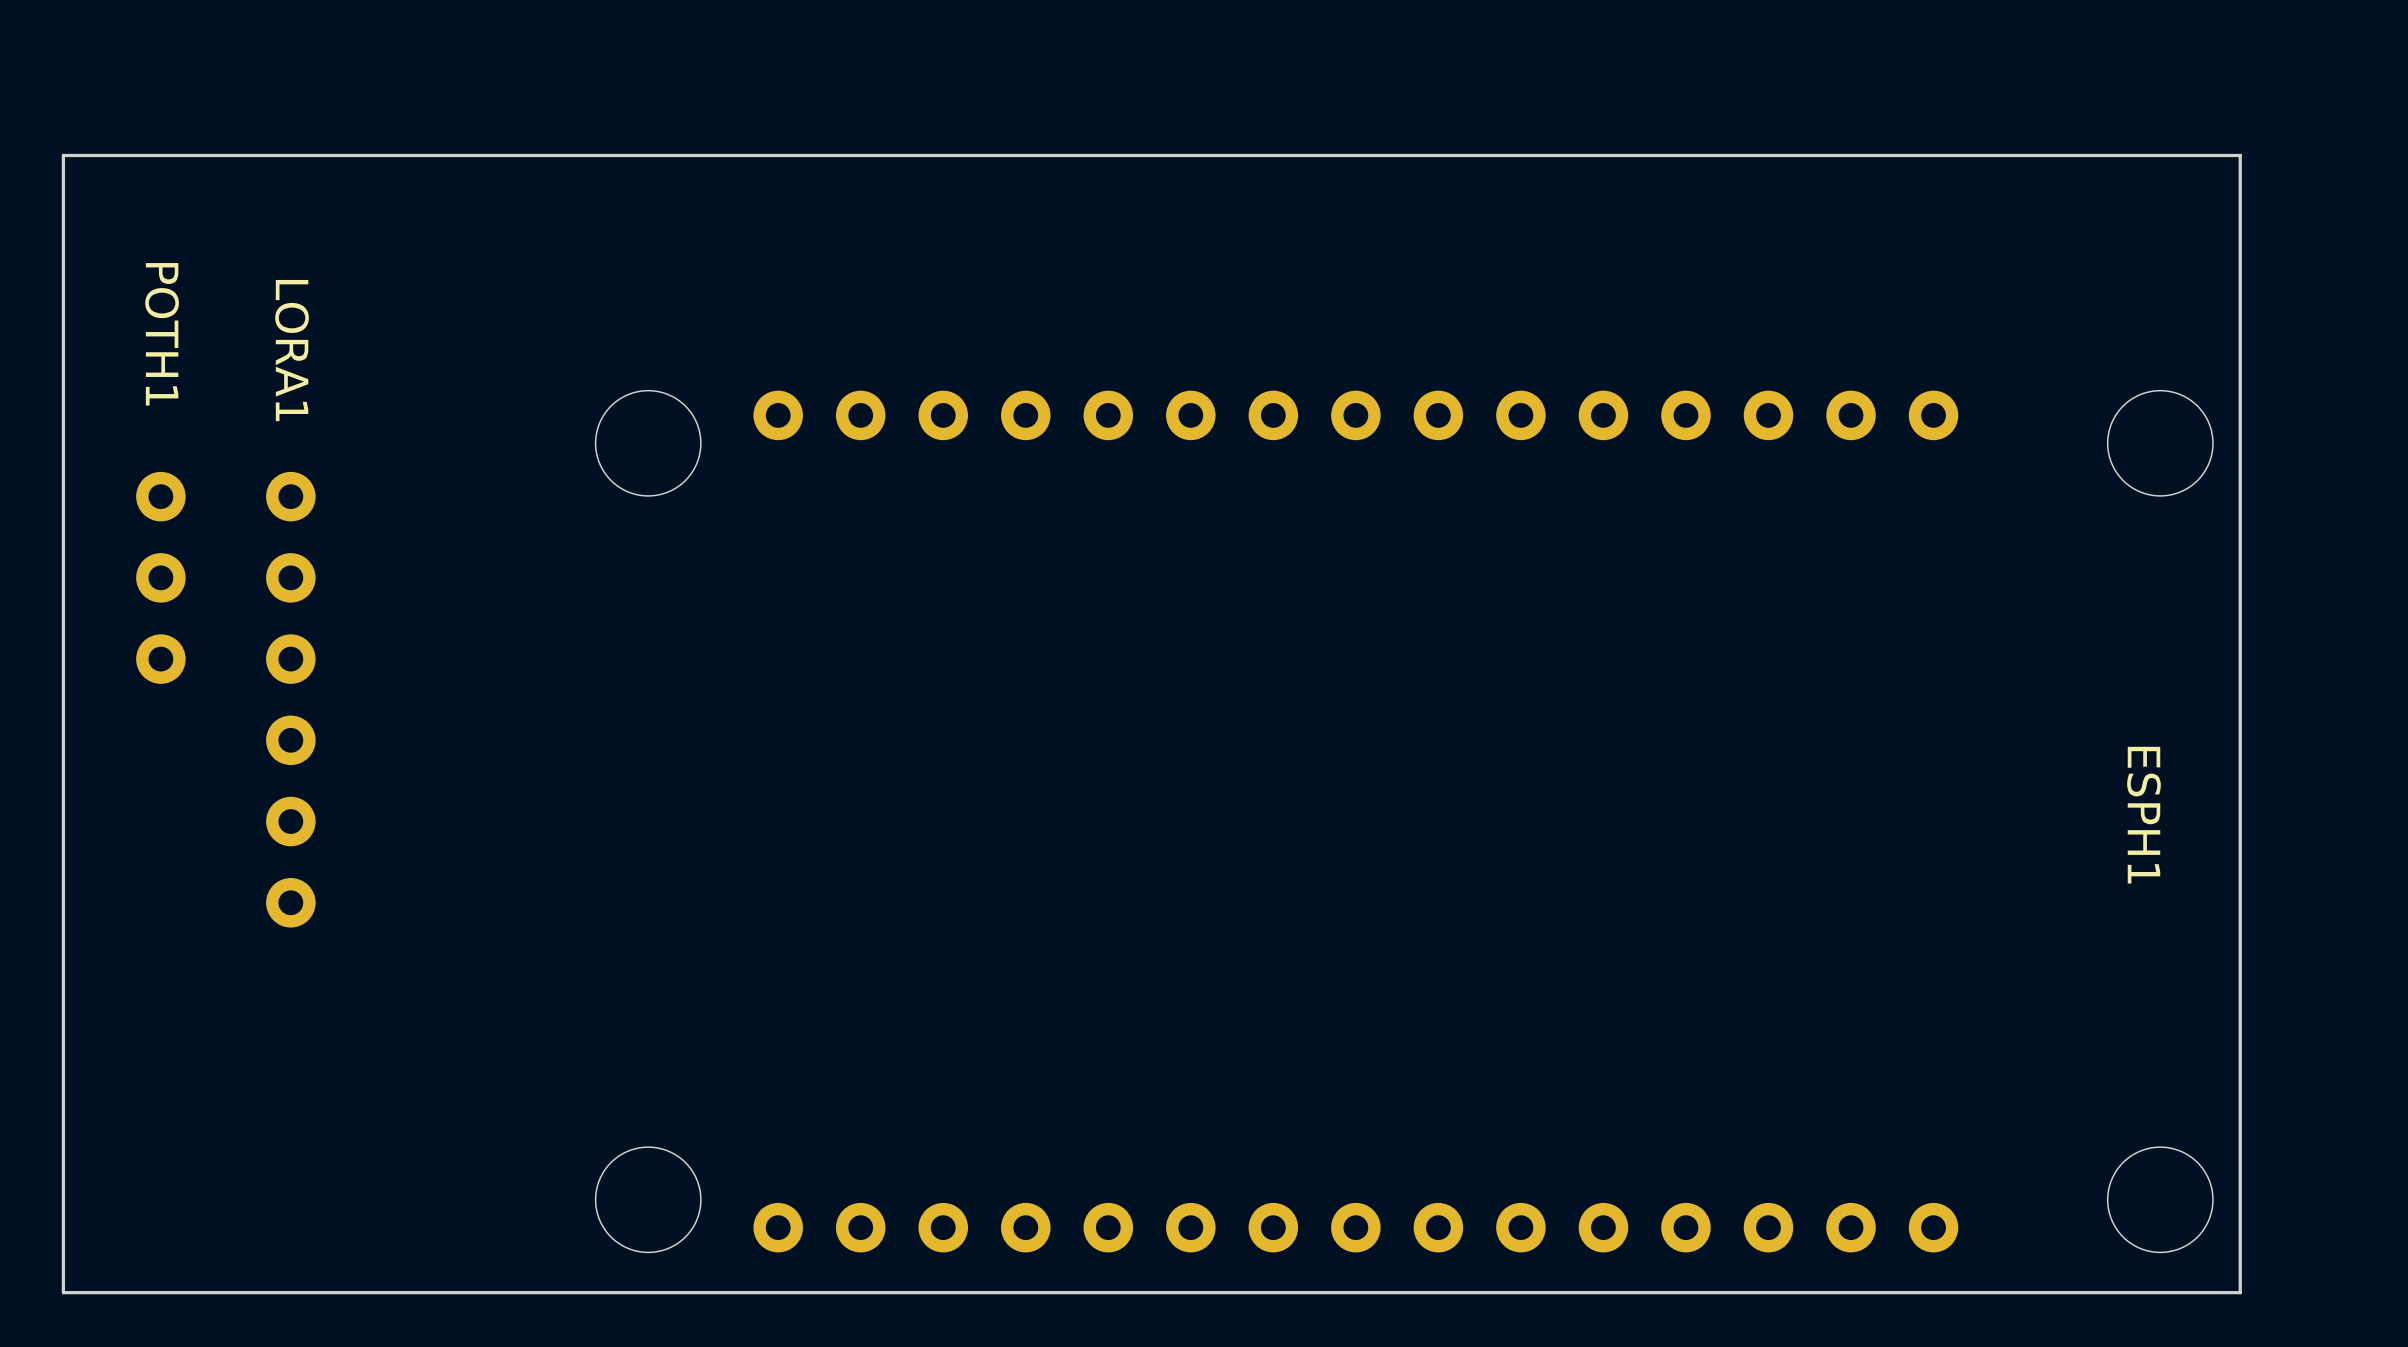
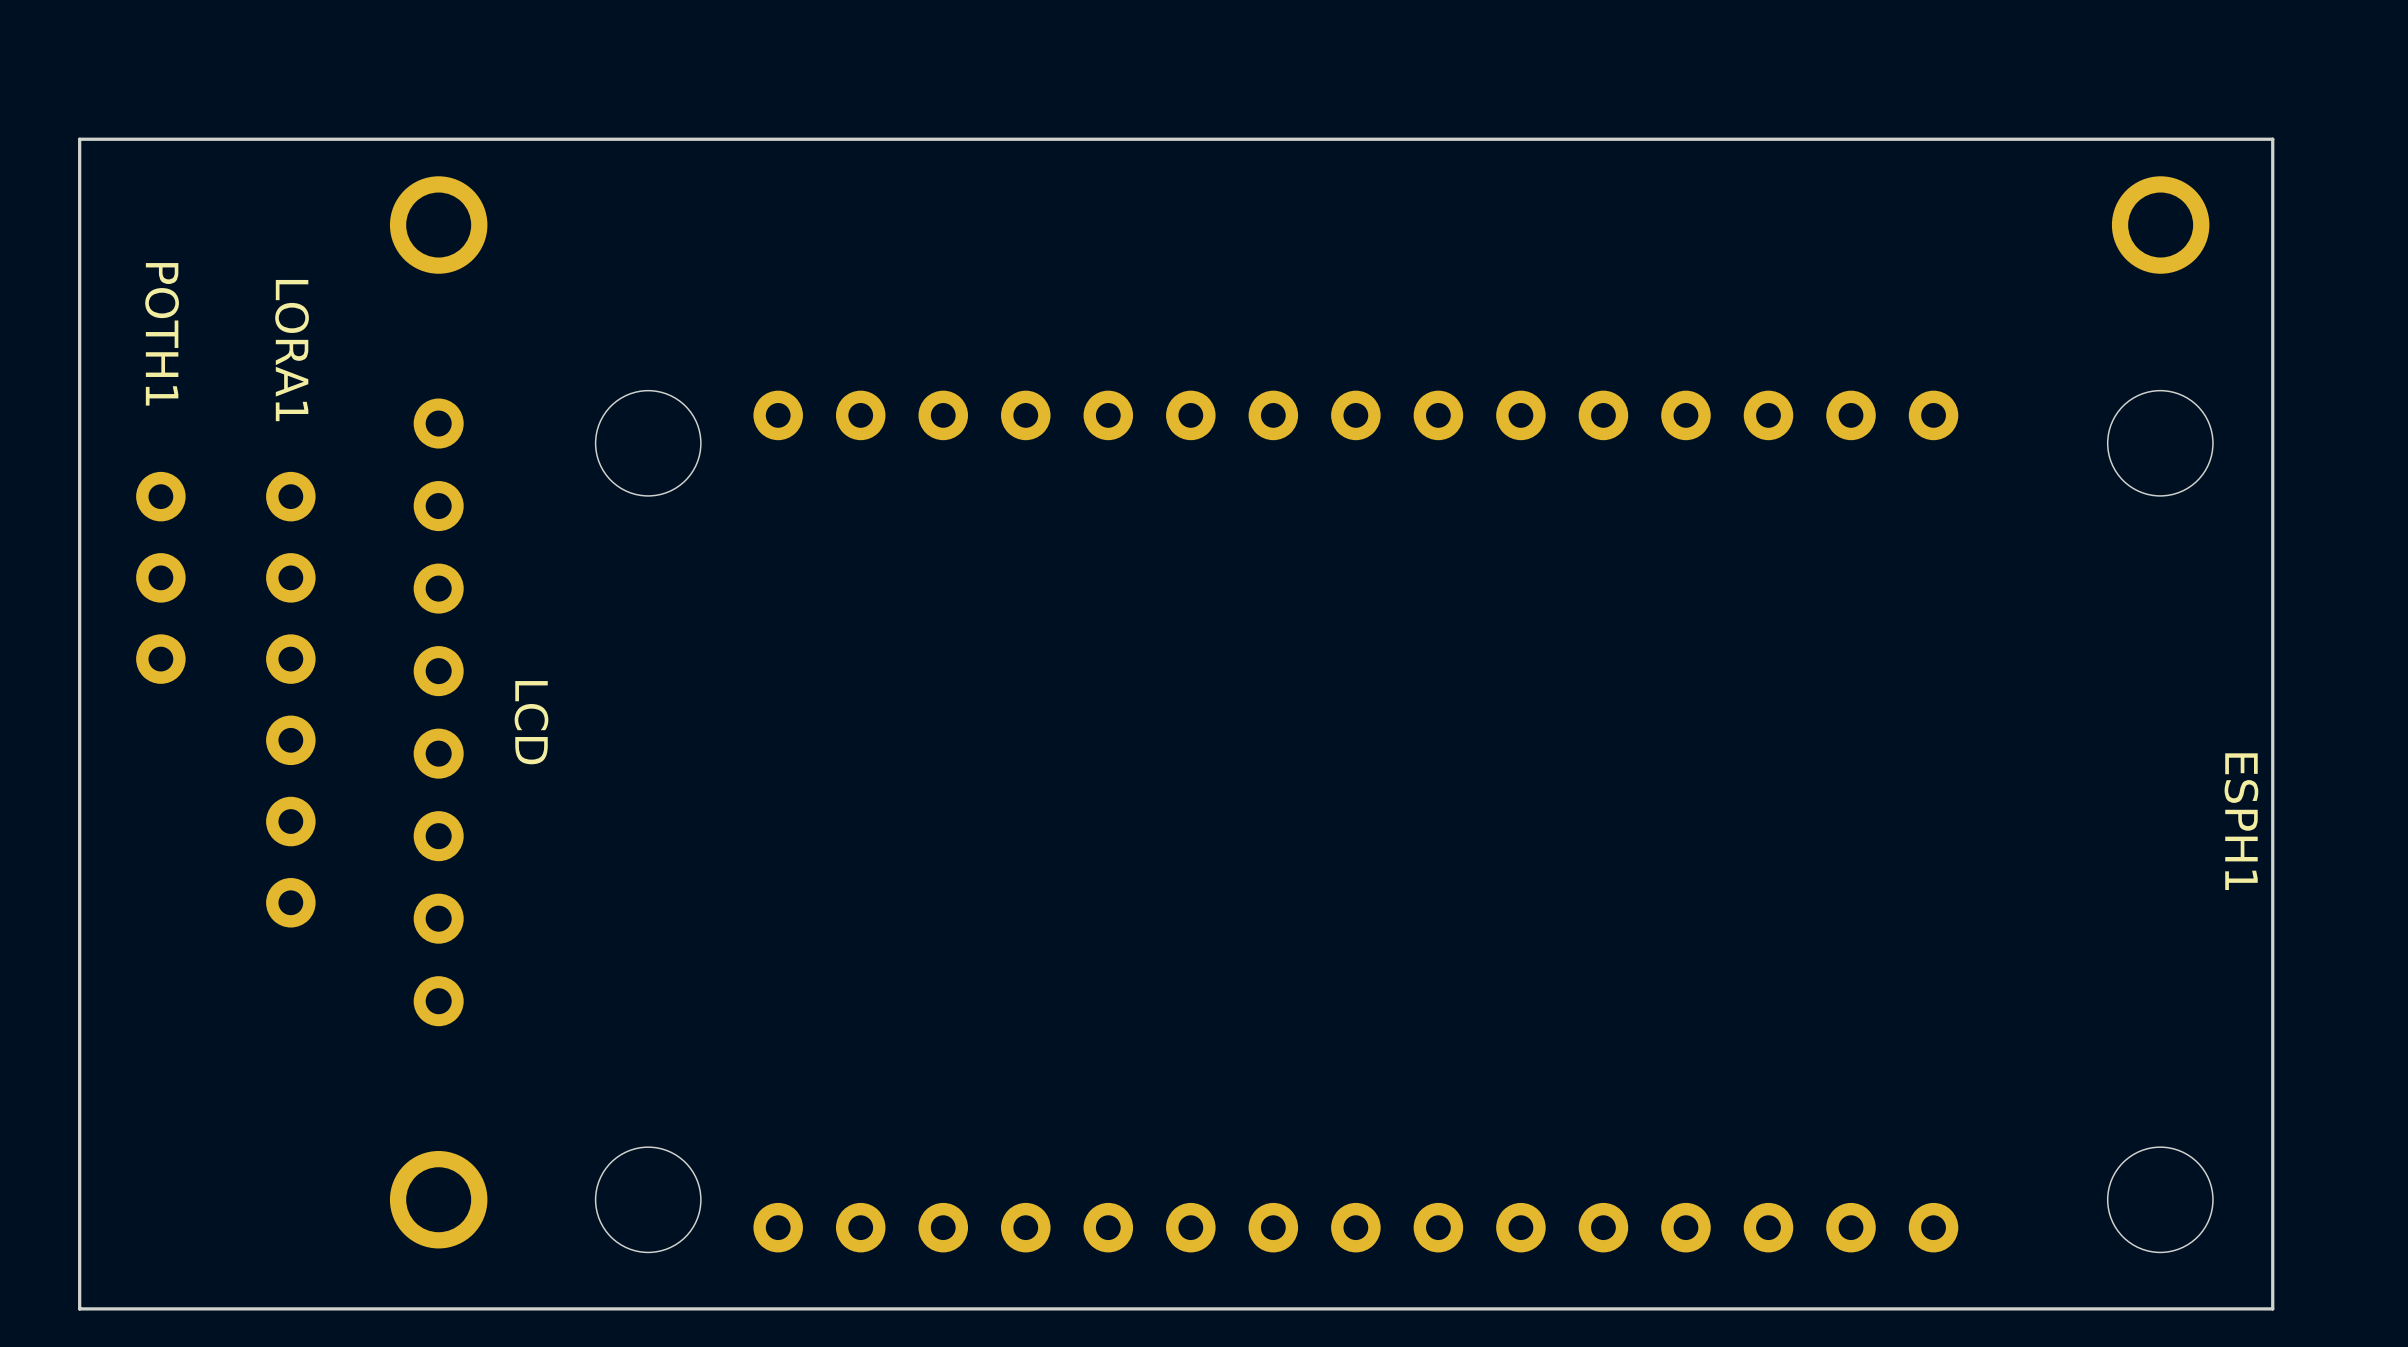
board edge: (63, 155) (2240, 155) (2240, 1292) (63, 1292) (63, 155) -> (79, 139) (79, 1308) (2272, 1308) (2272, 139) (79, 139)
LCD: none -> (1299, 712)
ESPH1 name position: ESPH1 (2143, 815) -> ESPH1 (2241, 821)

